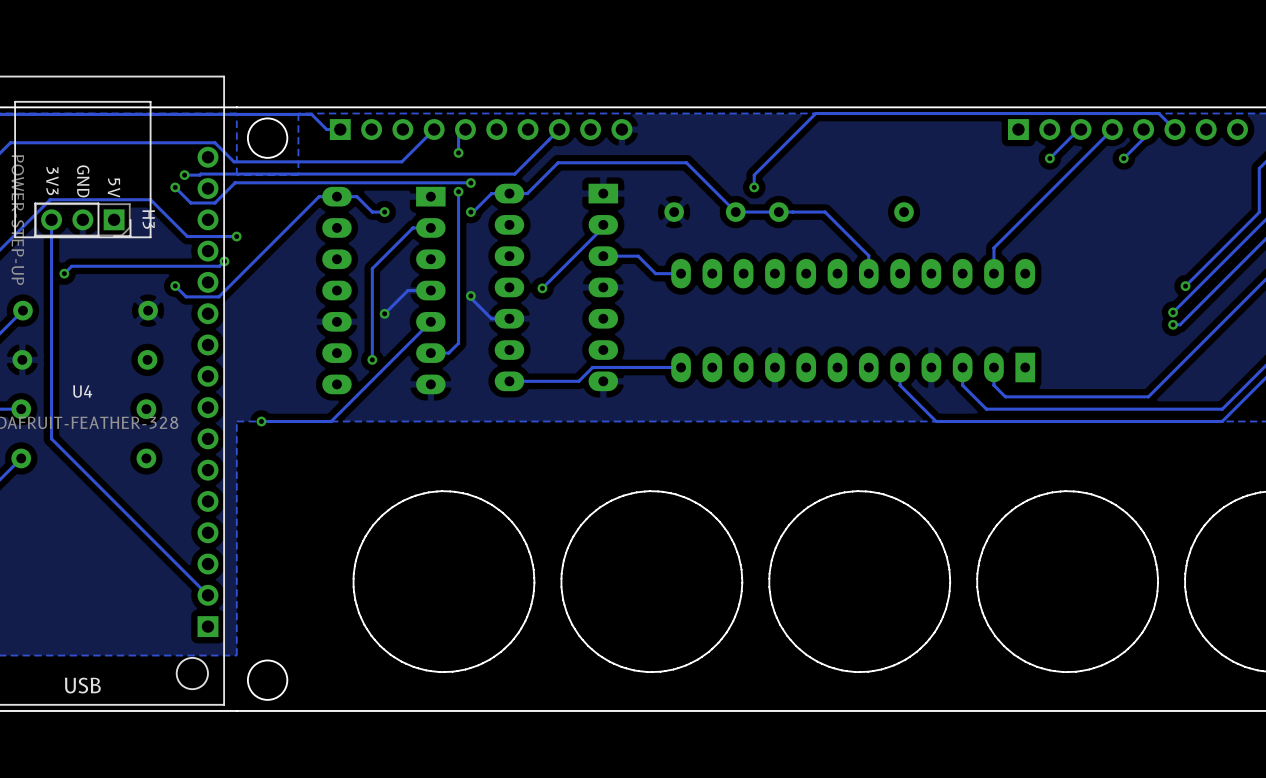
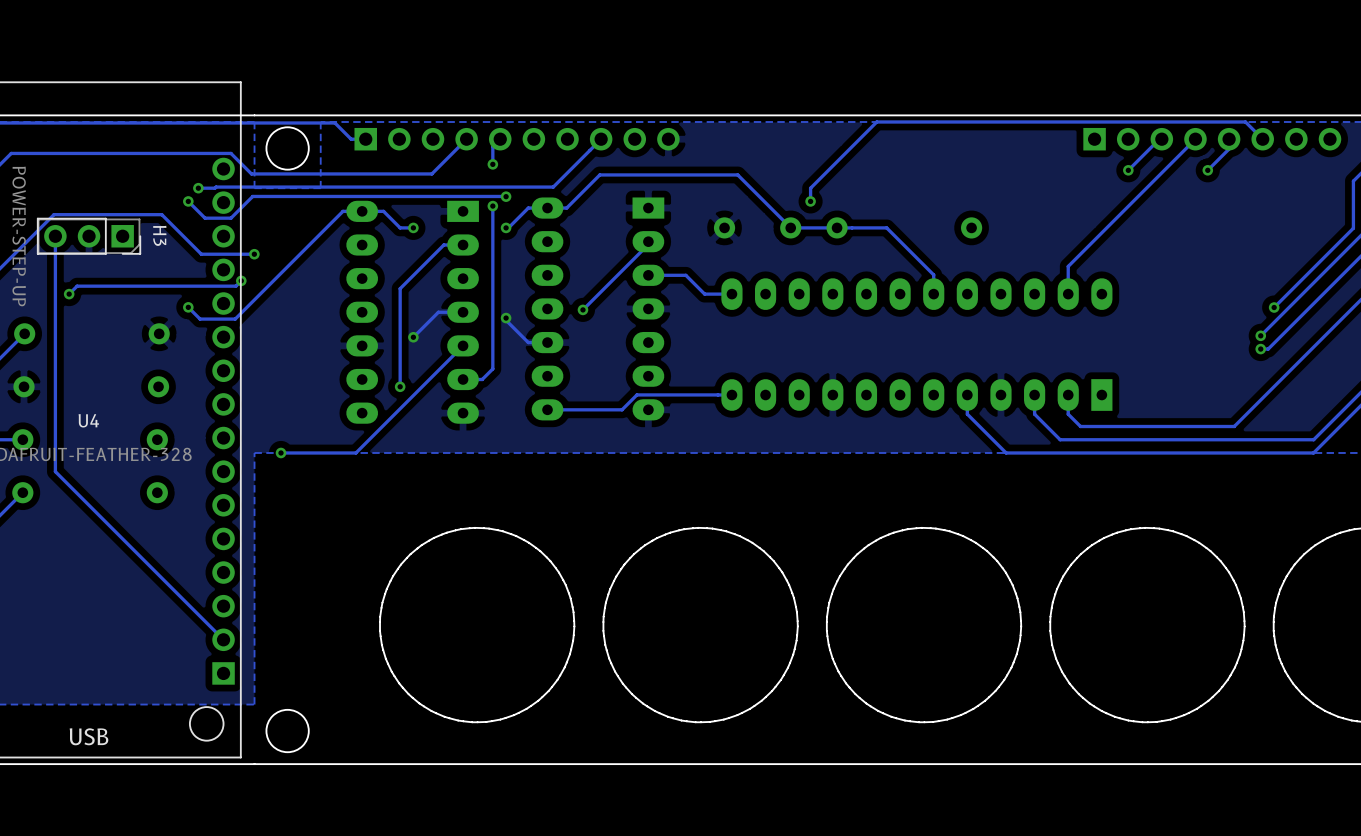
line: (150, 101) (15, 101) (15, 237) (150, 237) (150, 101) -> none
text: 3V3 (52, 181) -> none
text: GND (83, 181) -> none
text: 5V (114, 187) -> none

